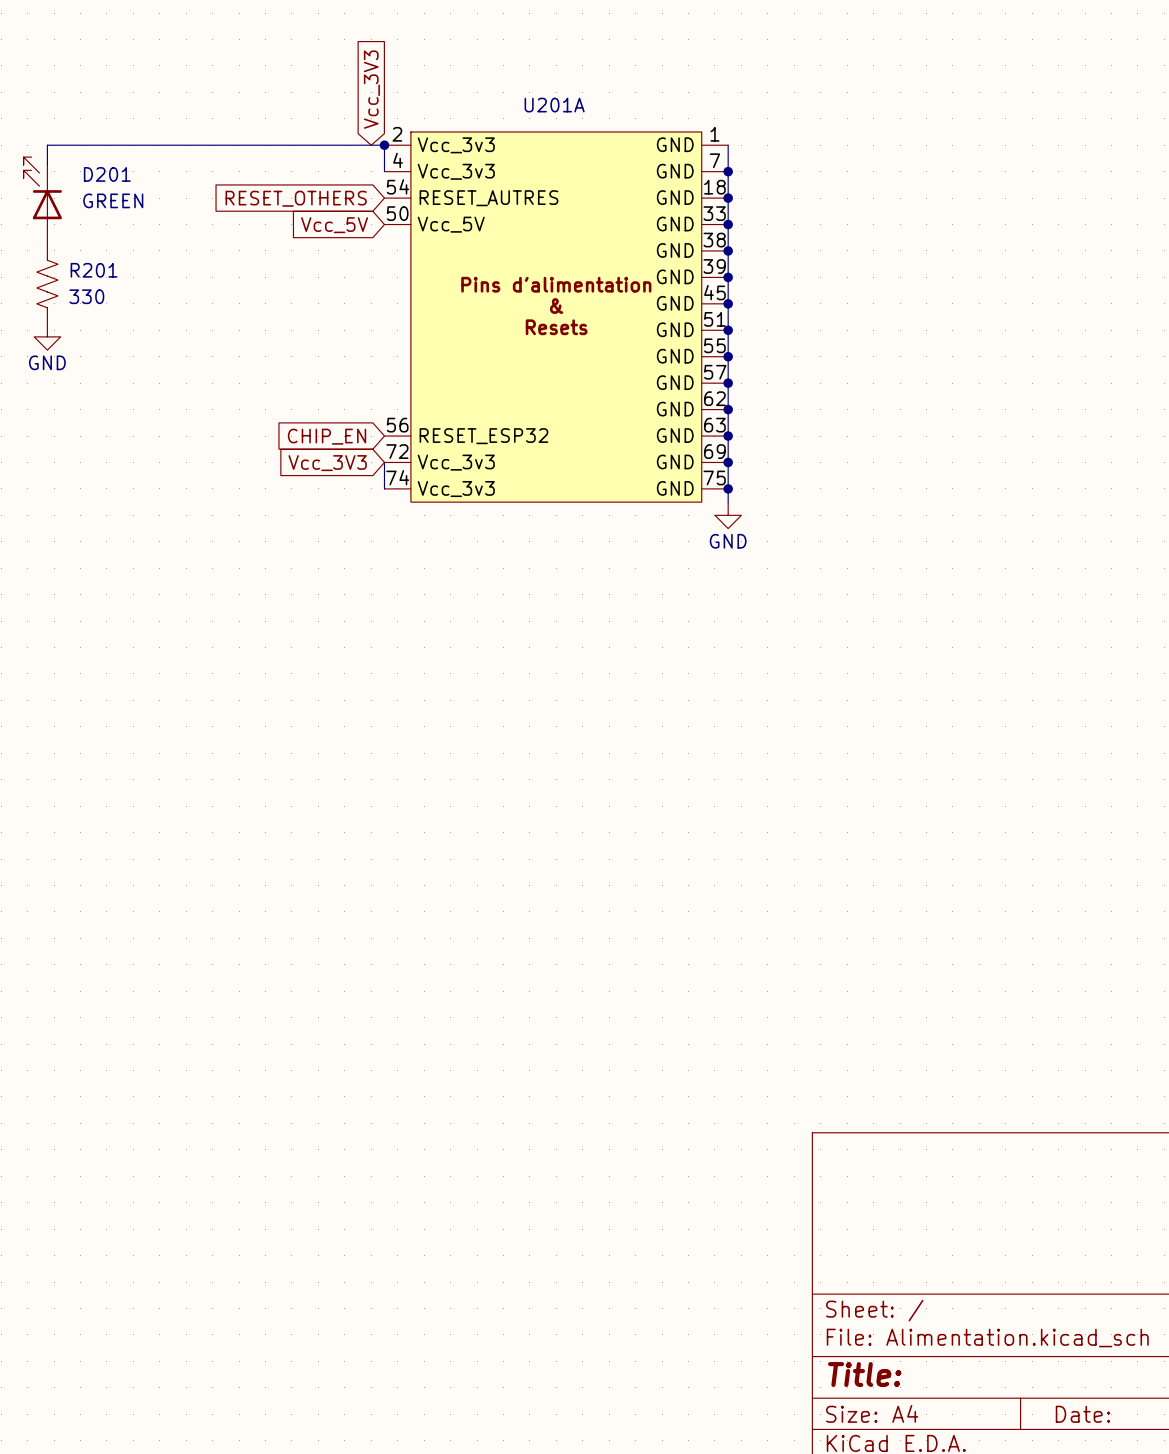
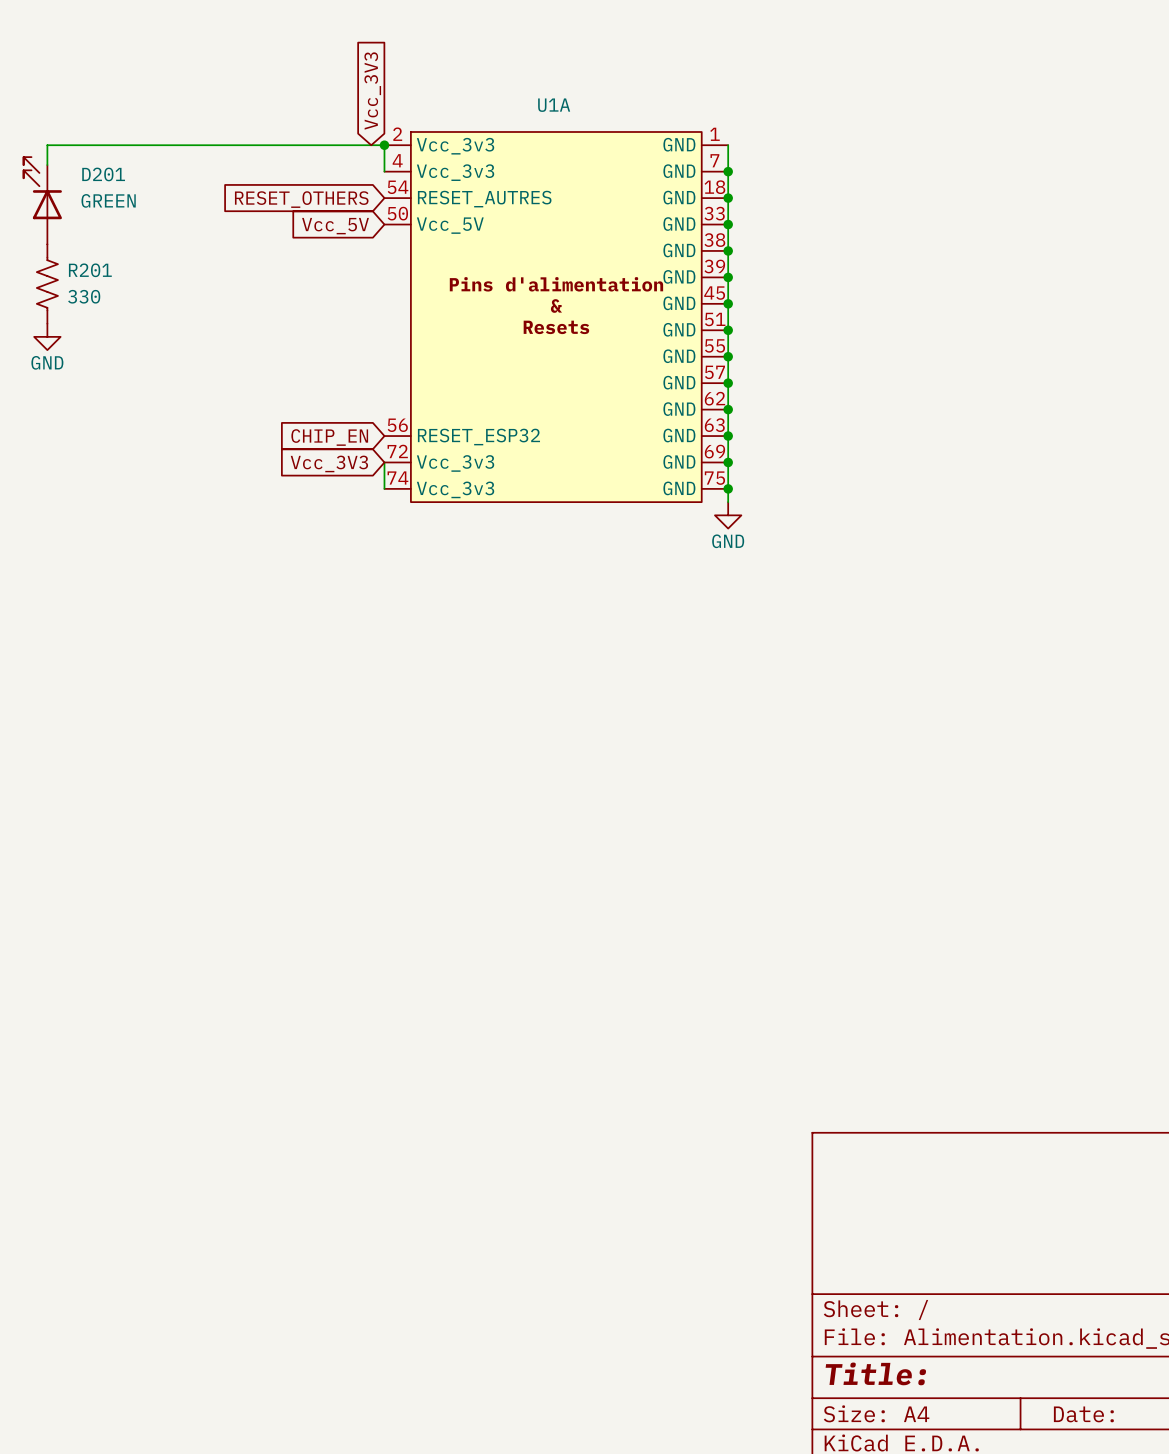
U201A name: U201A (554, 105) -> U1A (554, 105)

